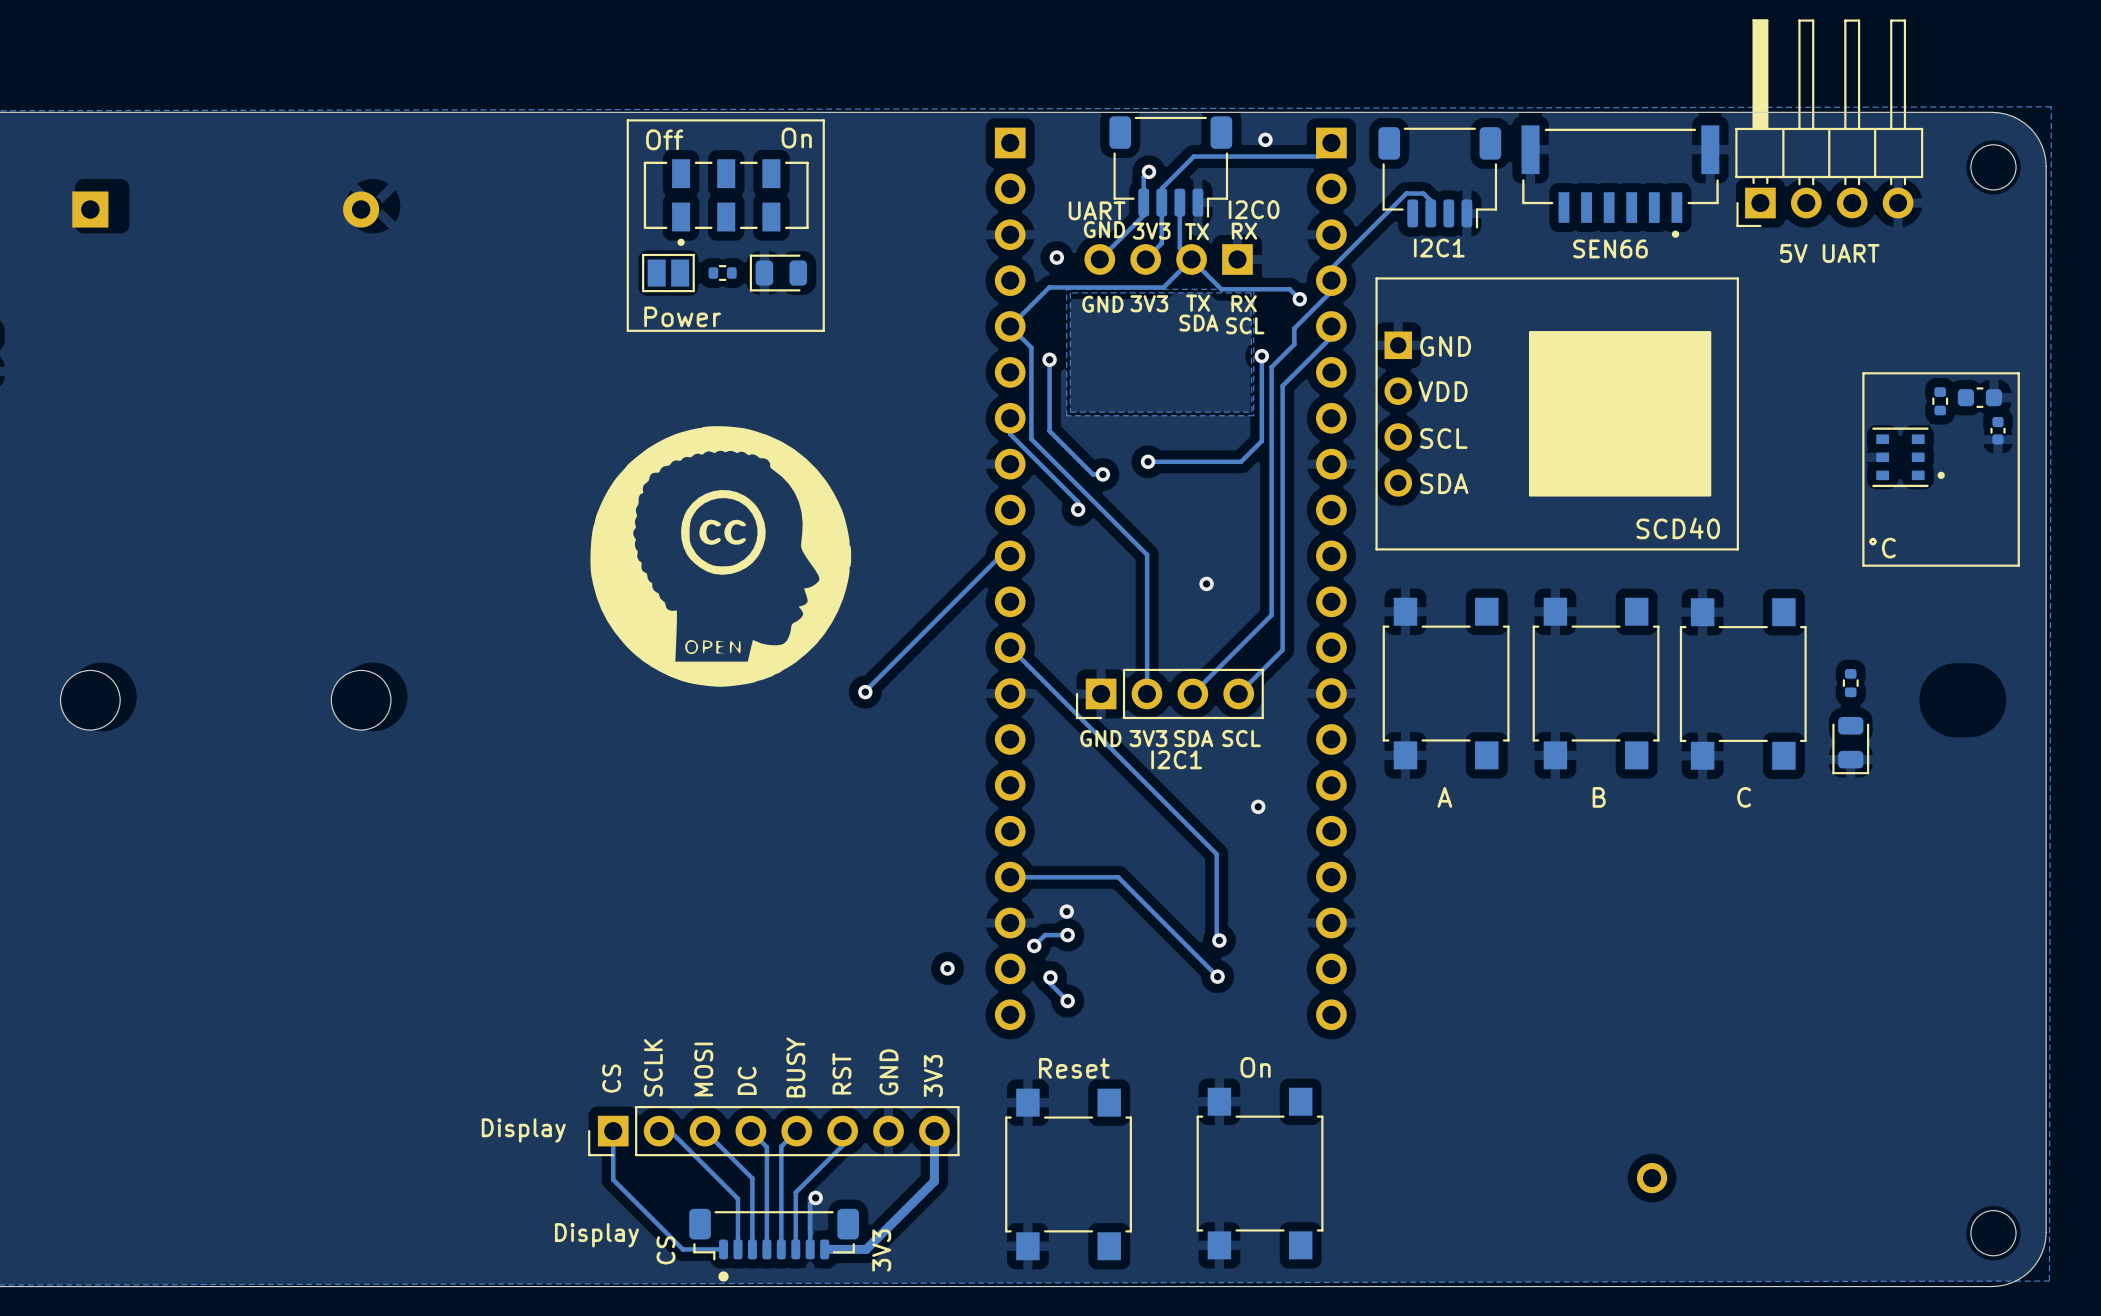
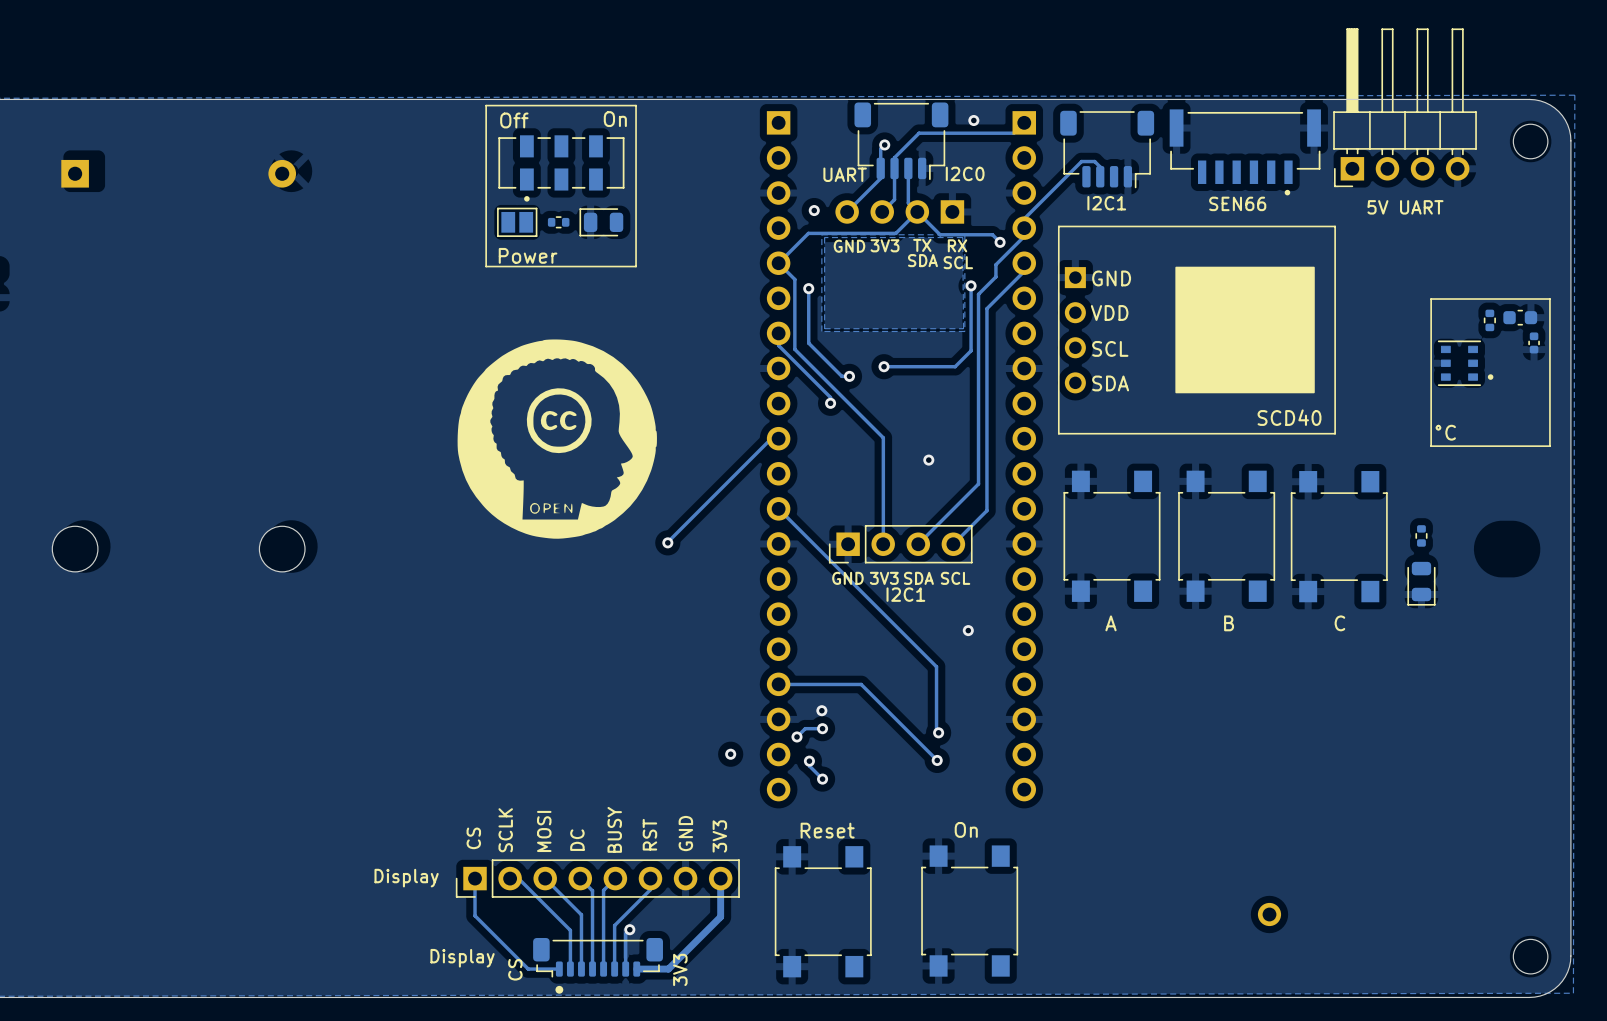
text: GND (1104, 229) -> none
text: 3V3 (1151, 231) -> none
text: TX (1197, 231) -> none
text: RX (1244, 231) -> none

